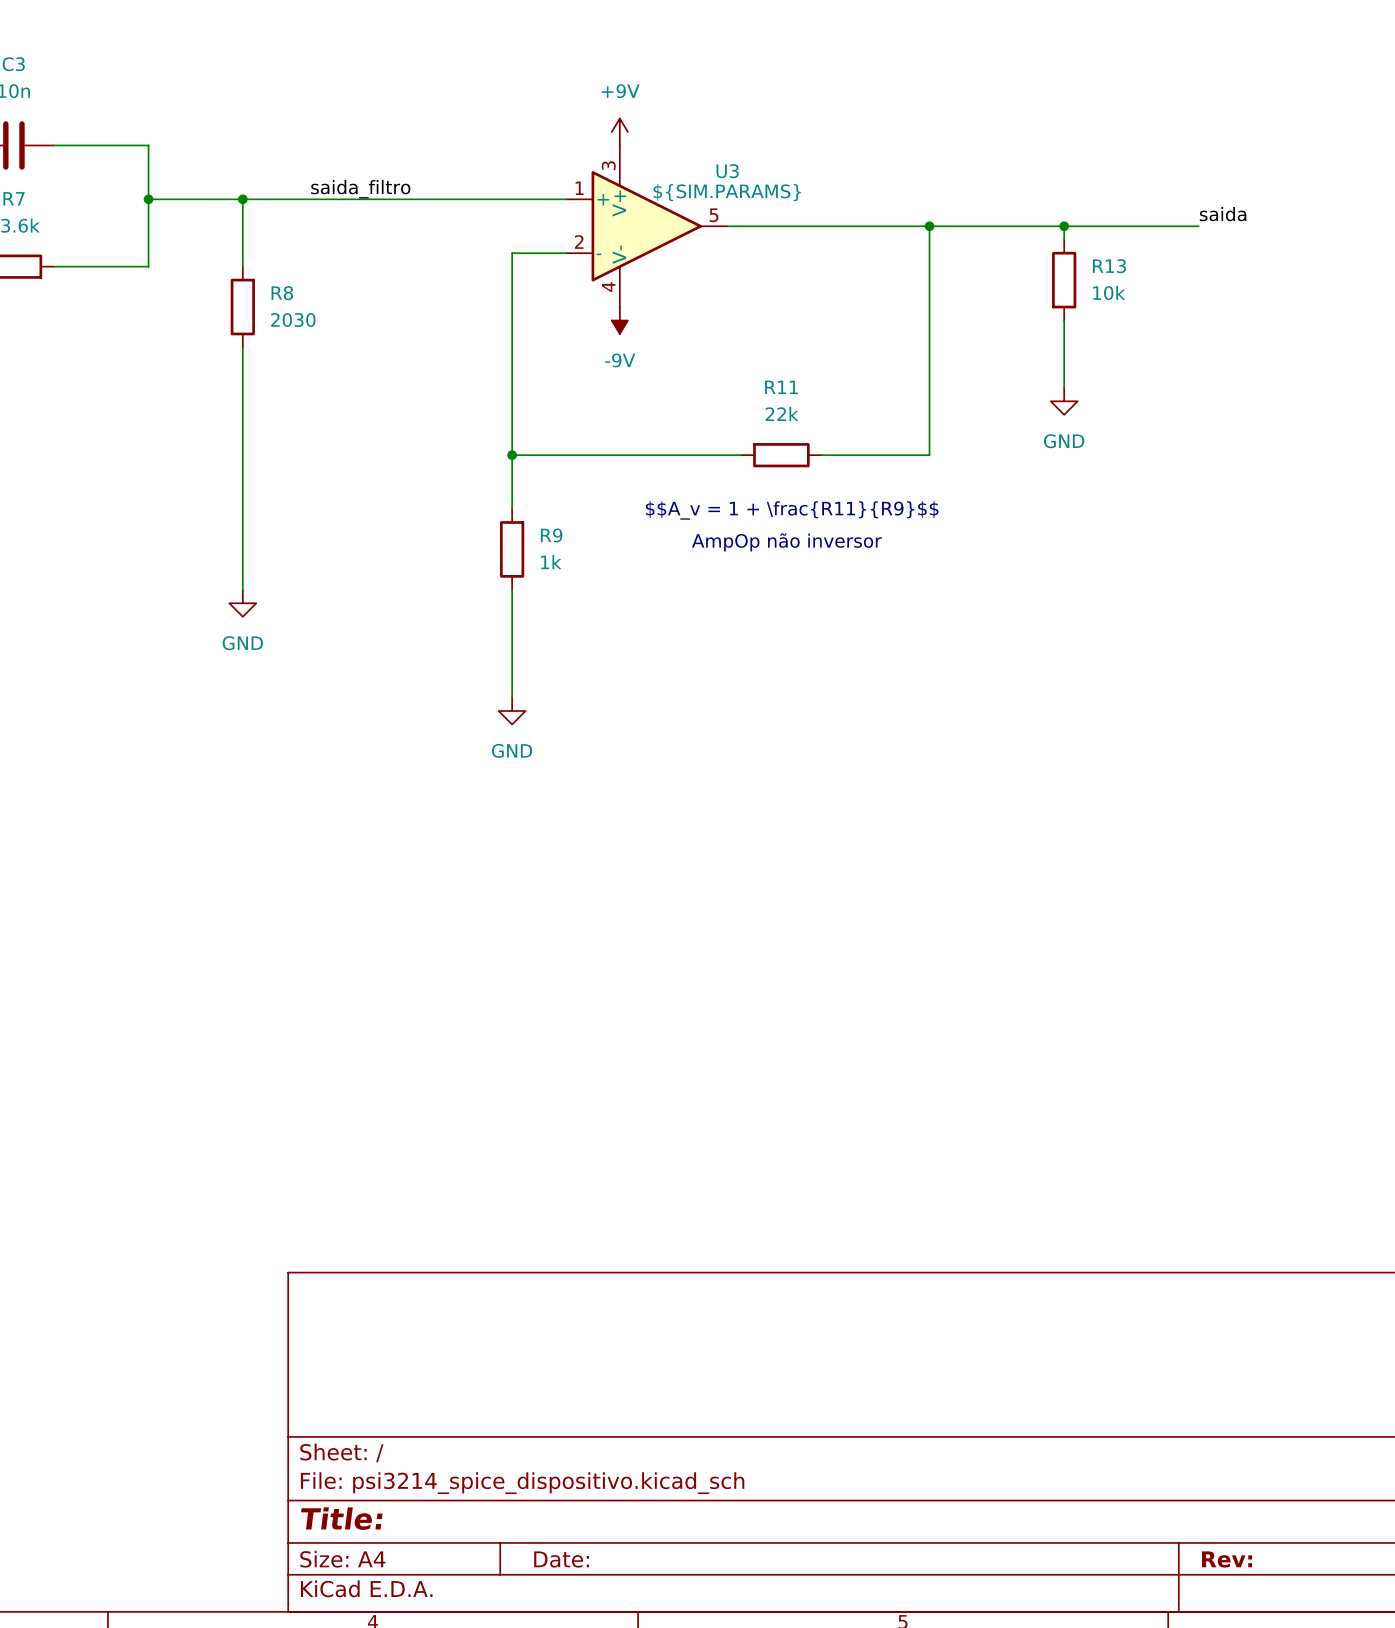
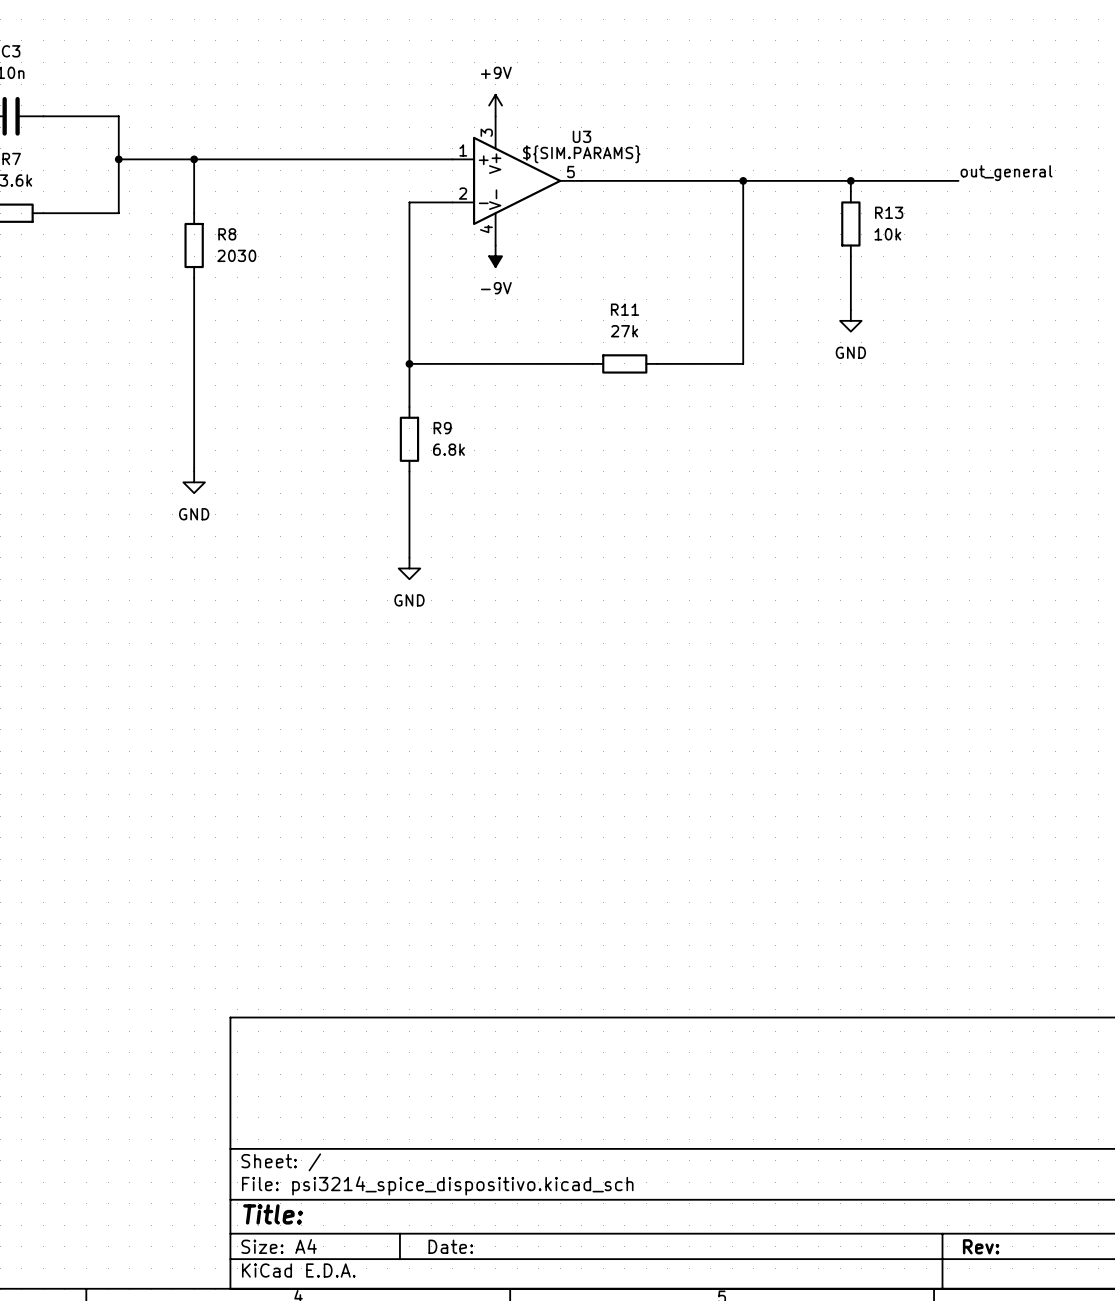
label: saida_filtro (360, 189) -> none
label: saida (1223, 214) -> out_general (1006, 173)
R11 value: 22k (782, 413) -> 27k (624, 331)
text: $$A_v = 1 + \frac{R11}{R9}$$ (792, 510) -> none
text: AmpOp não inversor (786, 542) -> none
R9 value: 1k (551, 562) -> 6.8k (449, 449)

